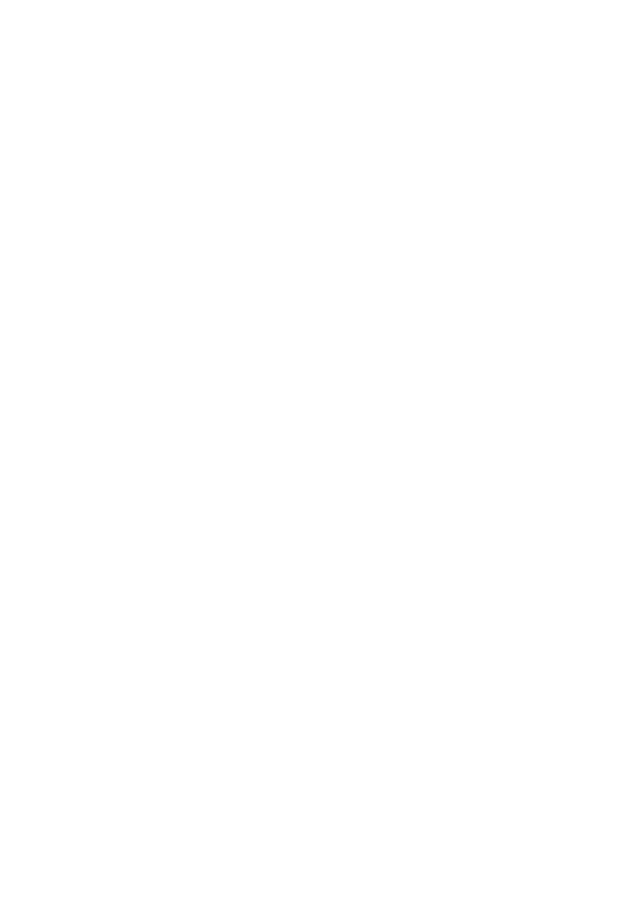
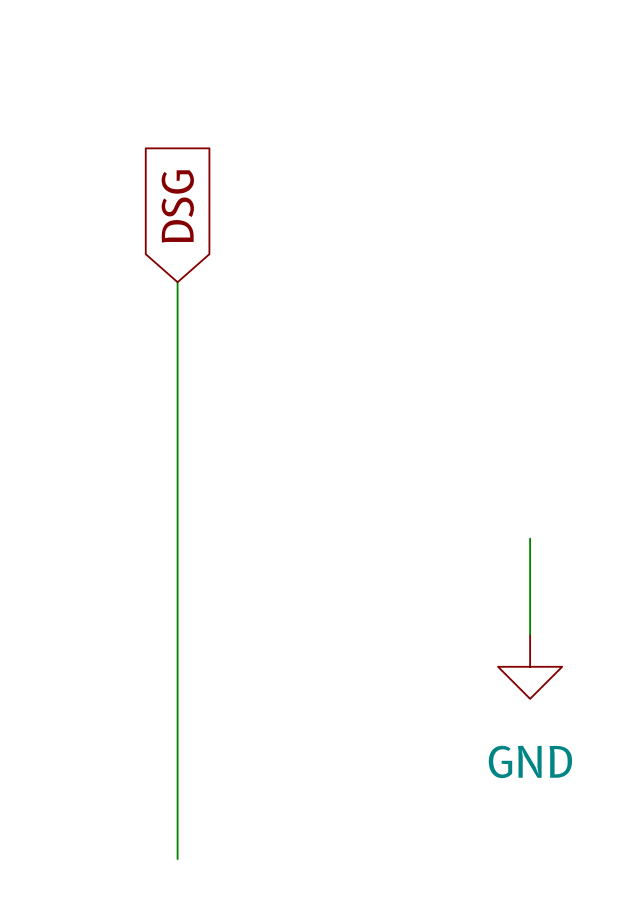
global label: none -> DSG (177, 206)
wire: none -> (177, 282) (177, 859)
wire: none -> (530, 538) (530, 634)
power symbol: none -> GND (530, 666)

